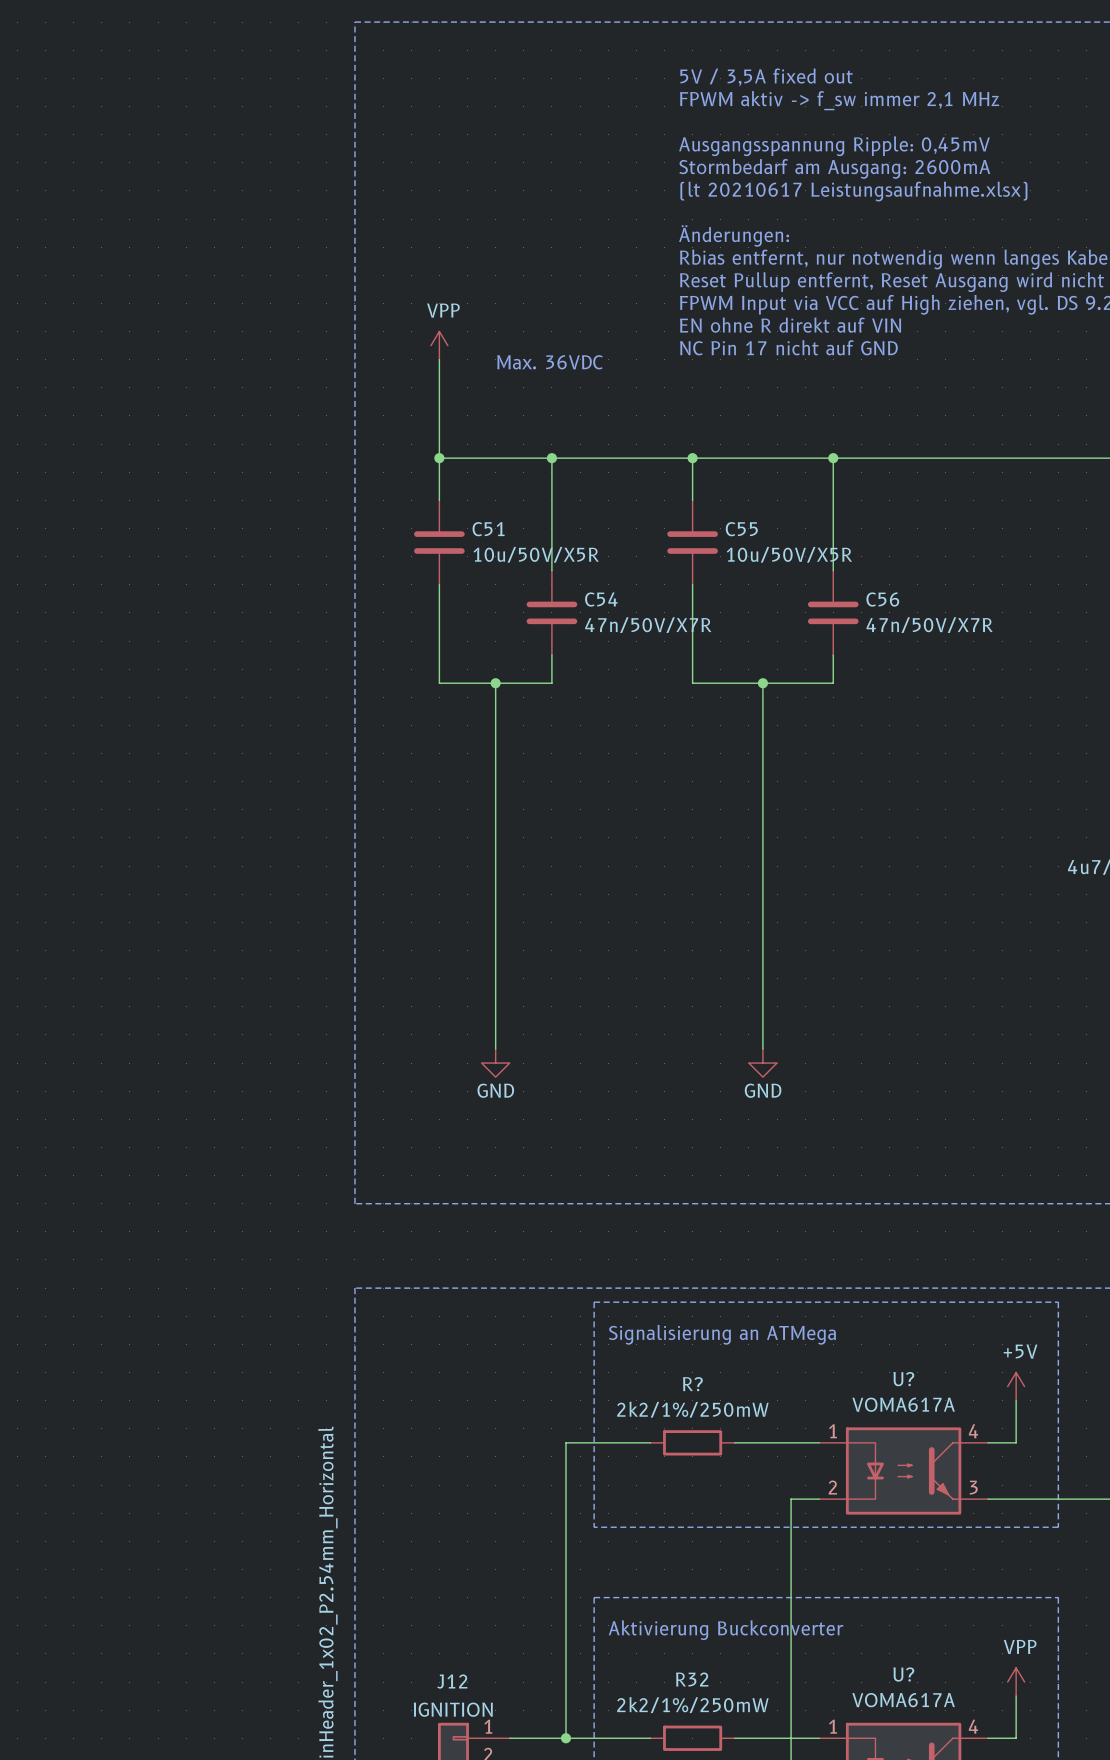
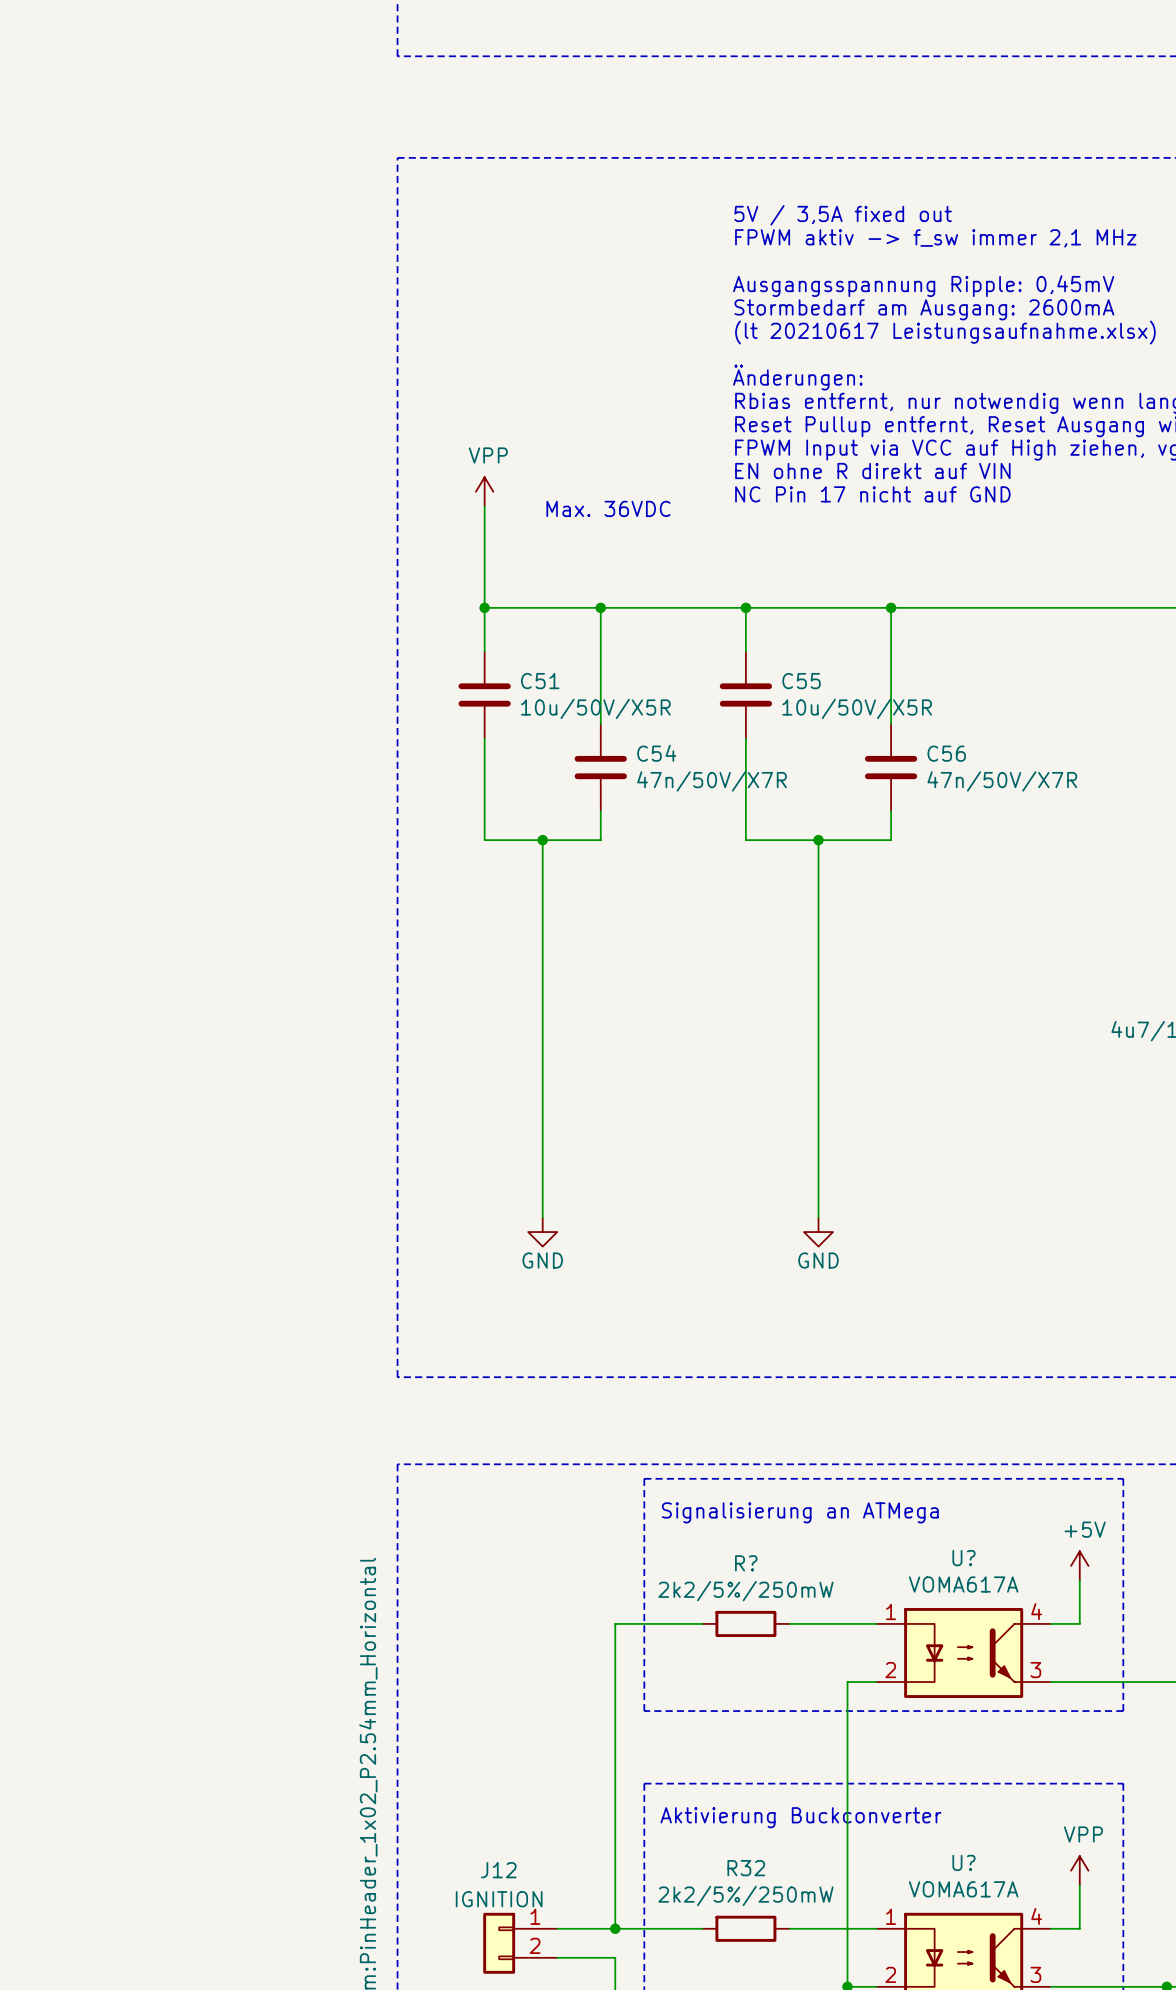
R? value: 2k2/1%/250mW (692, 1409) -> 2k2/5%/250mW (745, 1591)
R32 value: 2k2/1%/250mW (692, 1705) -> 2k2/5%/250mW (745, 1895)

